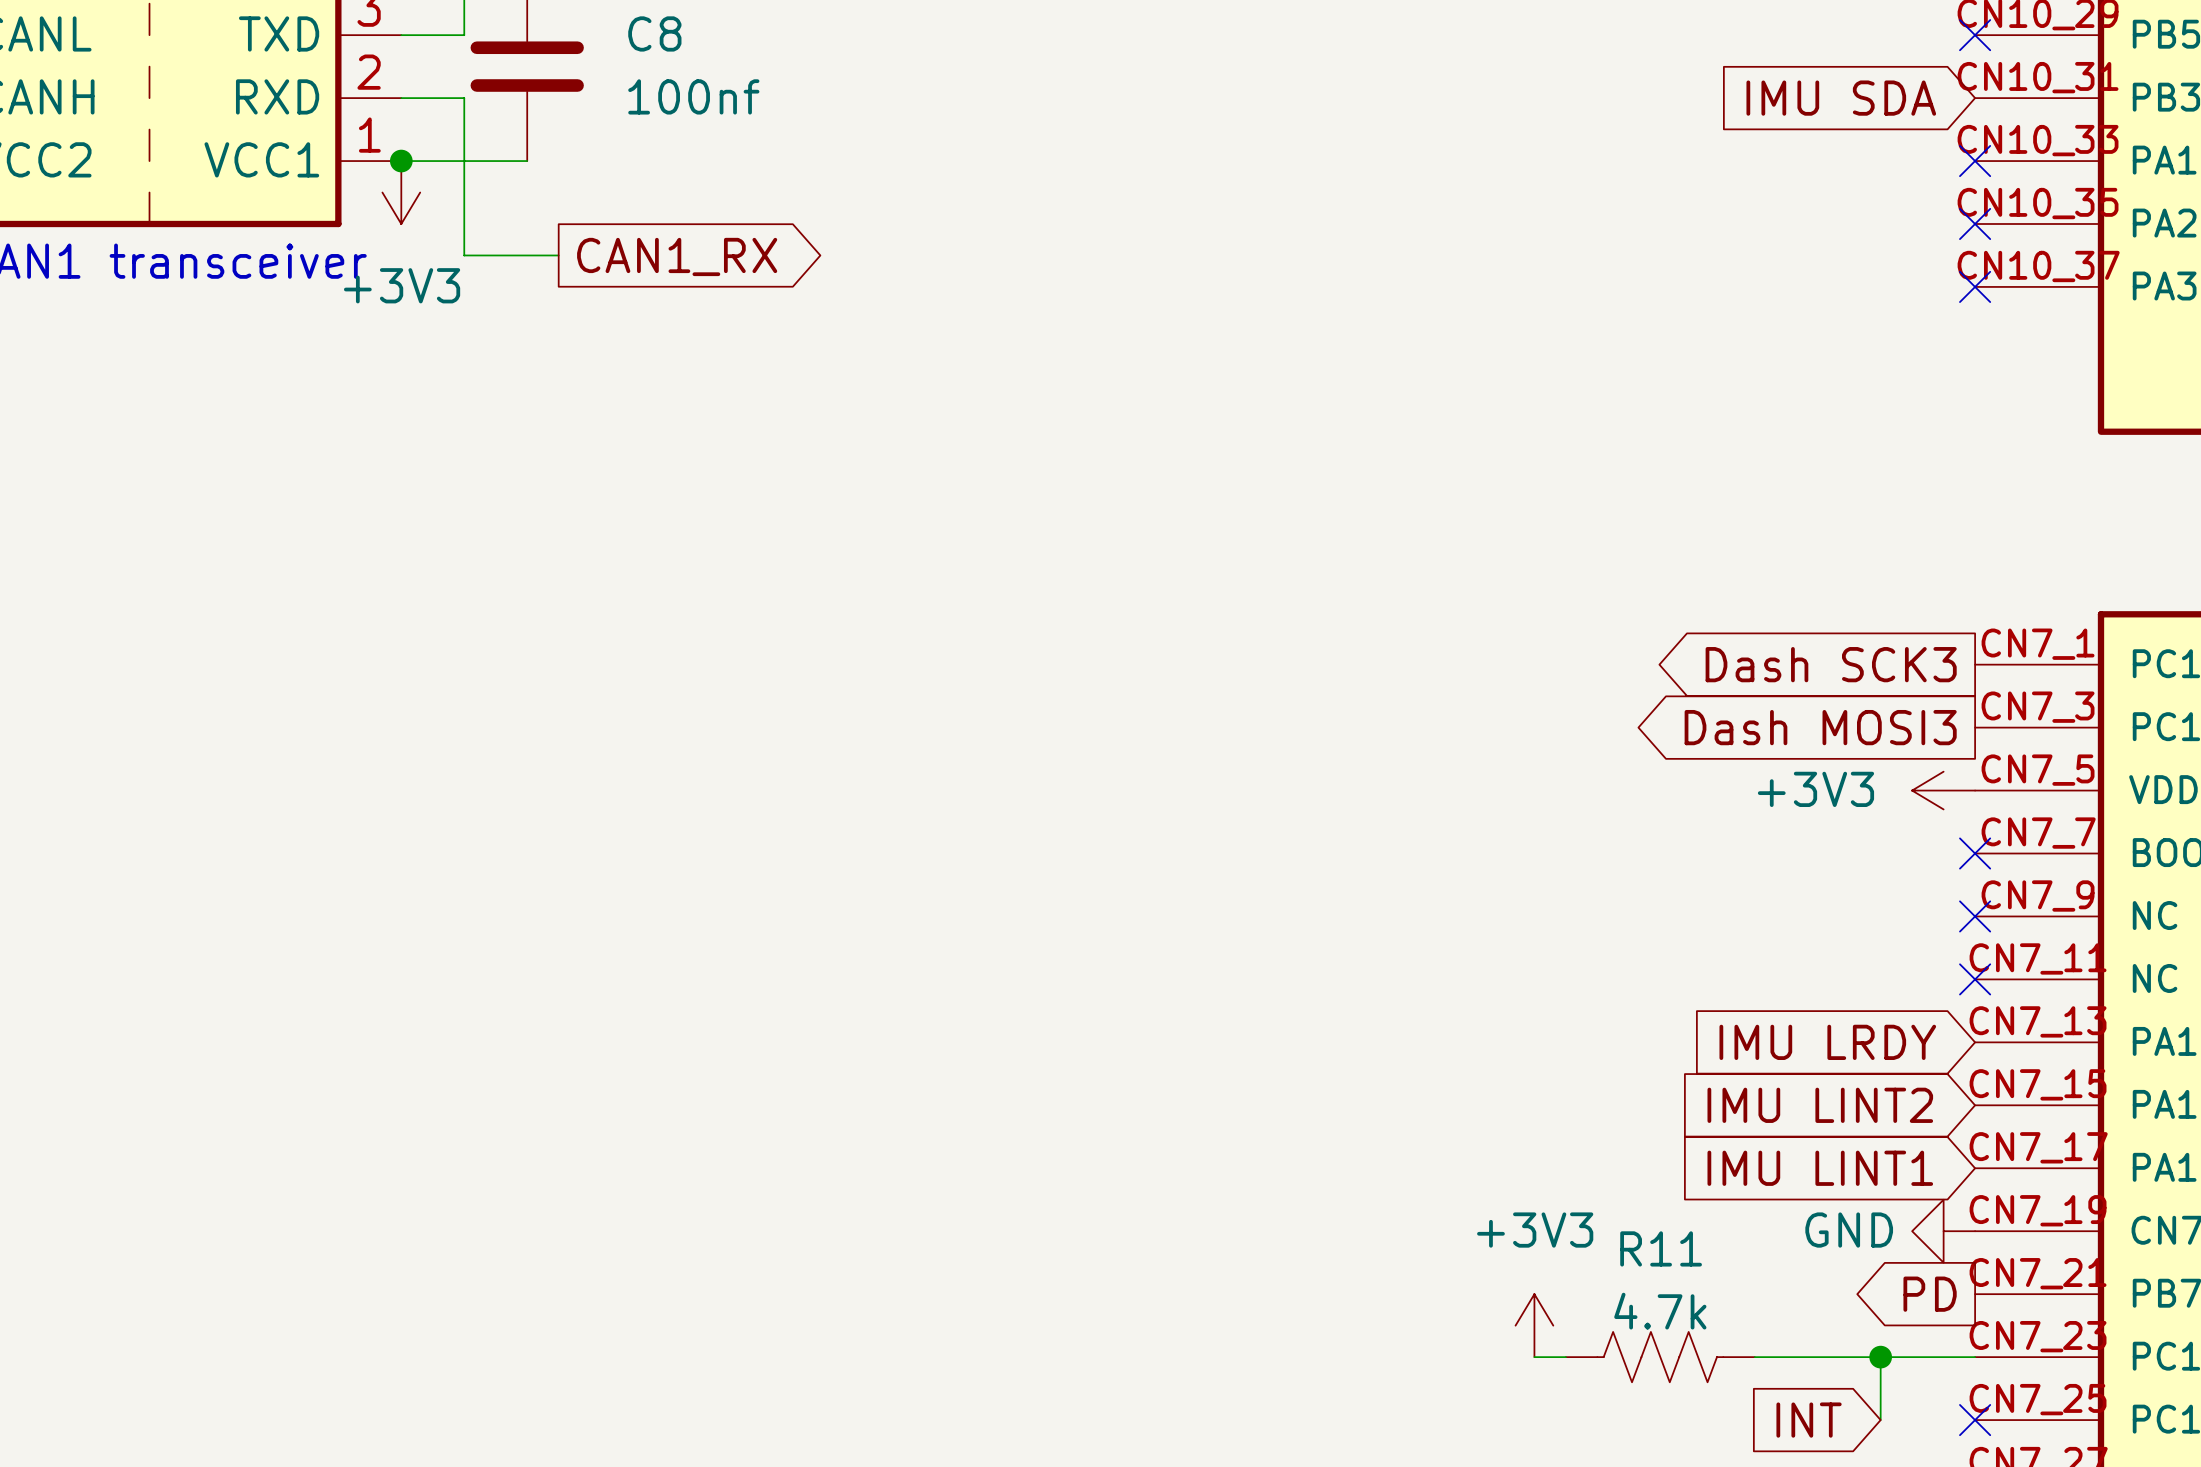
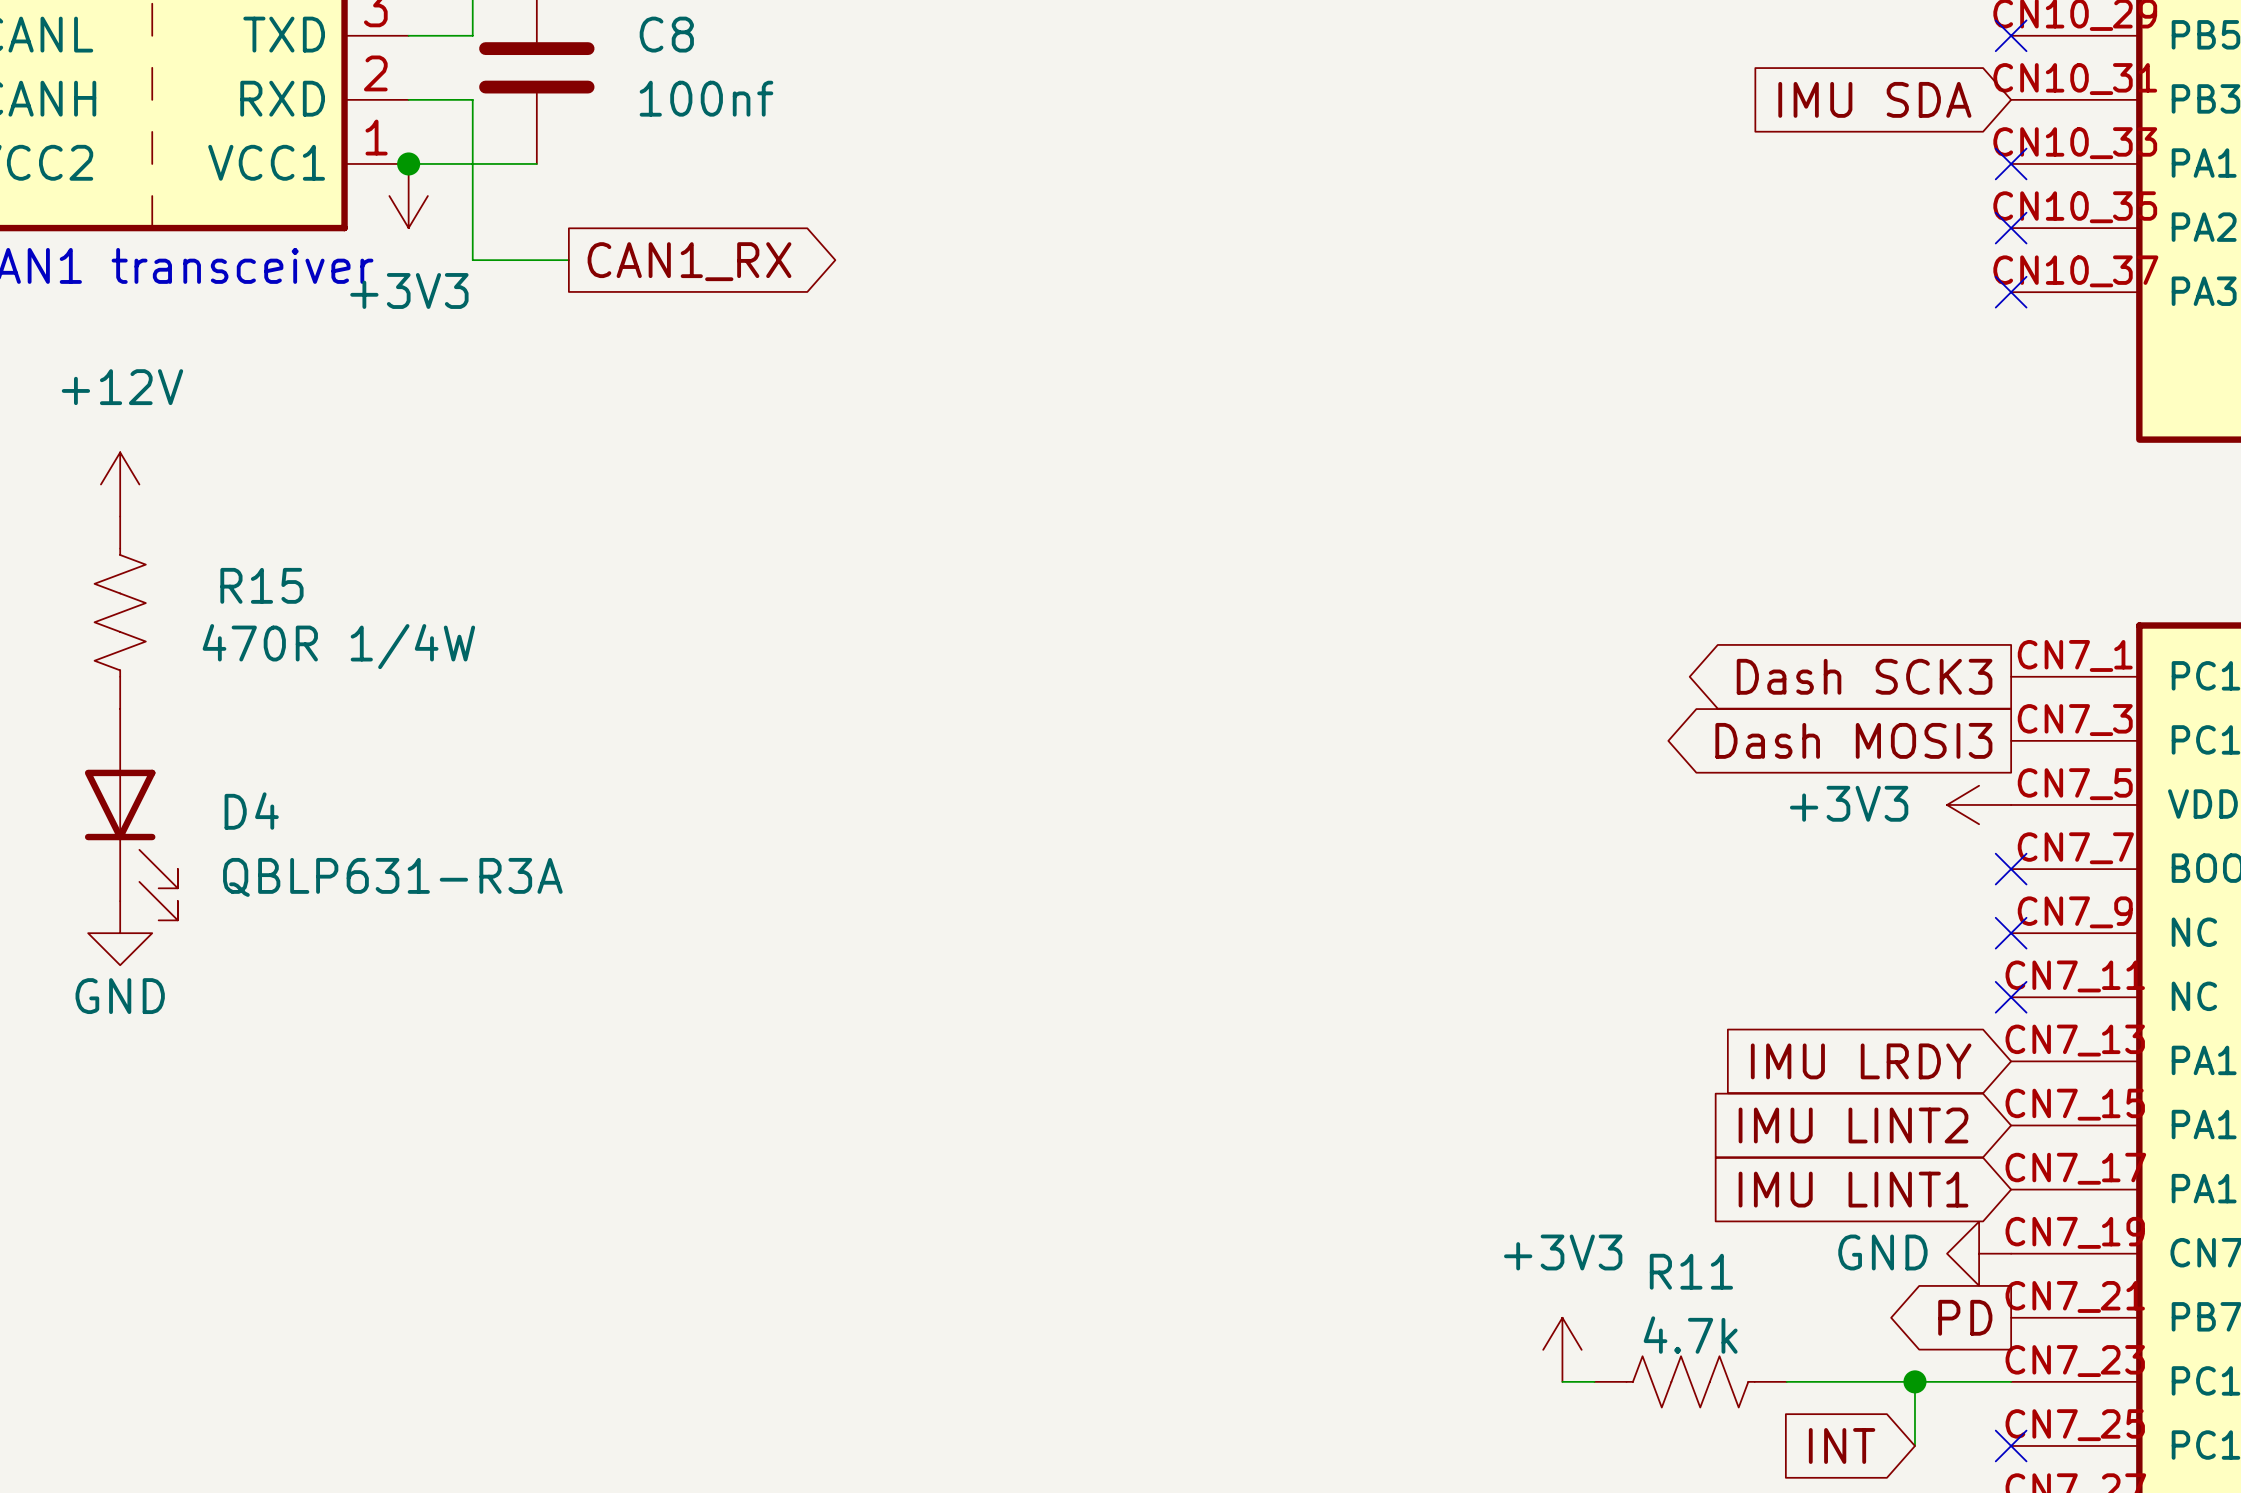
power symbol: none -> +12V (120, 484)
R15: none -> 470R 1/4W (120, 612)
D4: none -> QBLP631-R3A (131, 814)
power symbol: none -> GND (120, 933)

